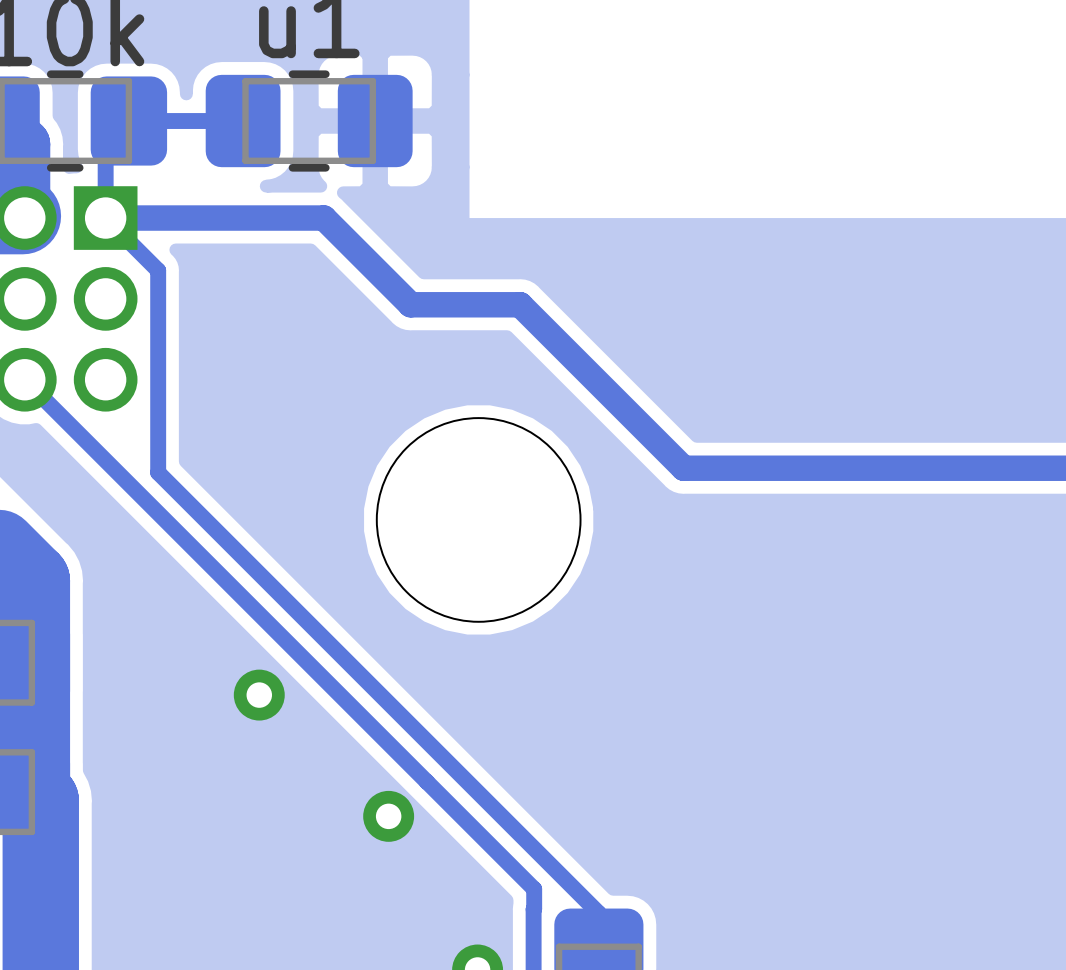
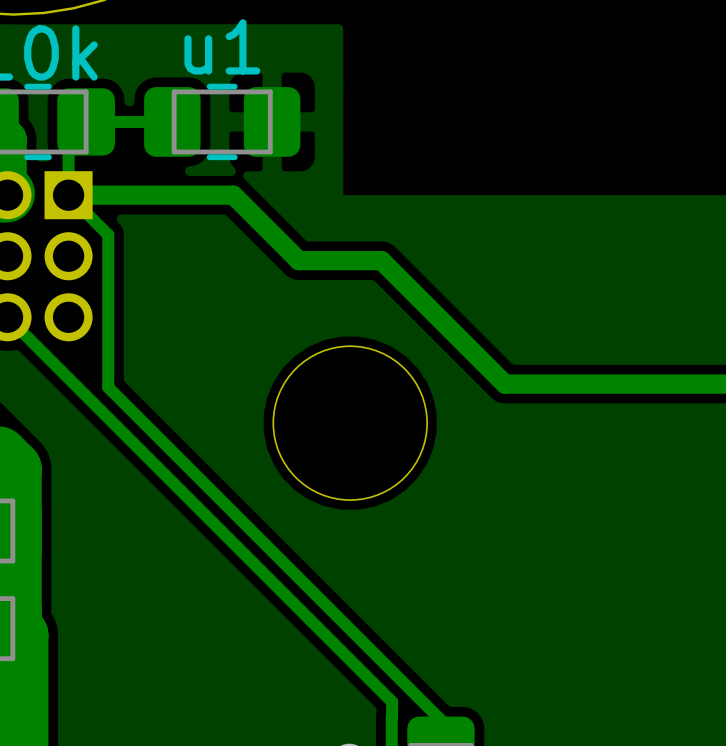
via: (259, 695) -> none
via: (388, 816) -> none

